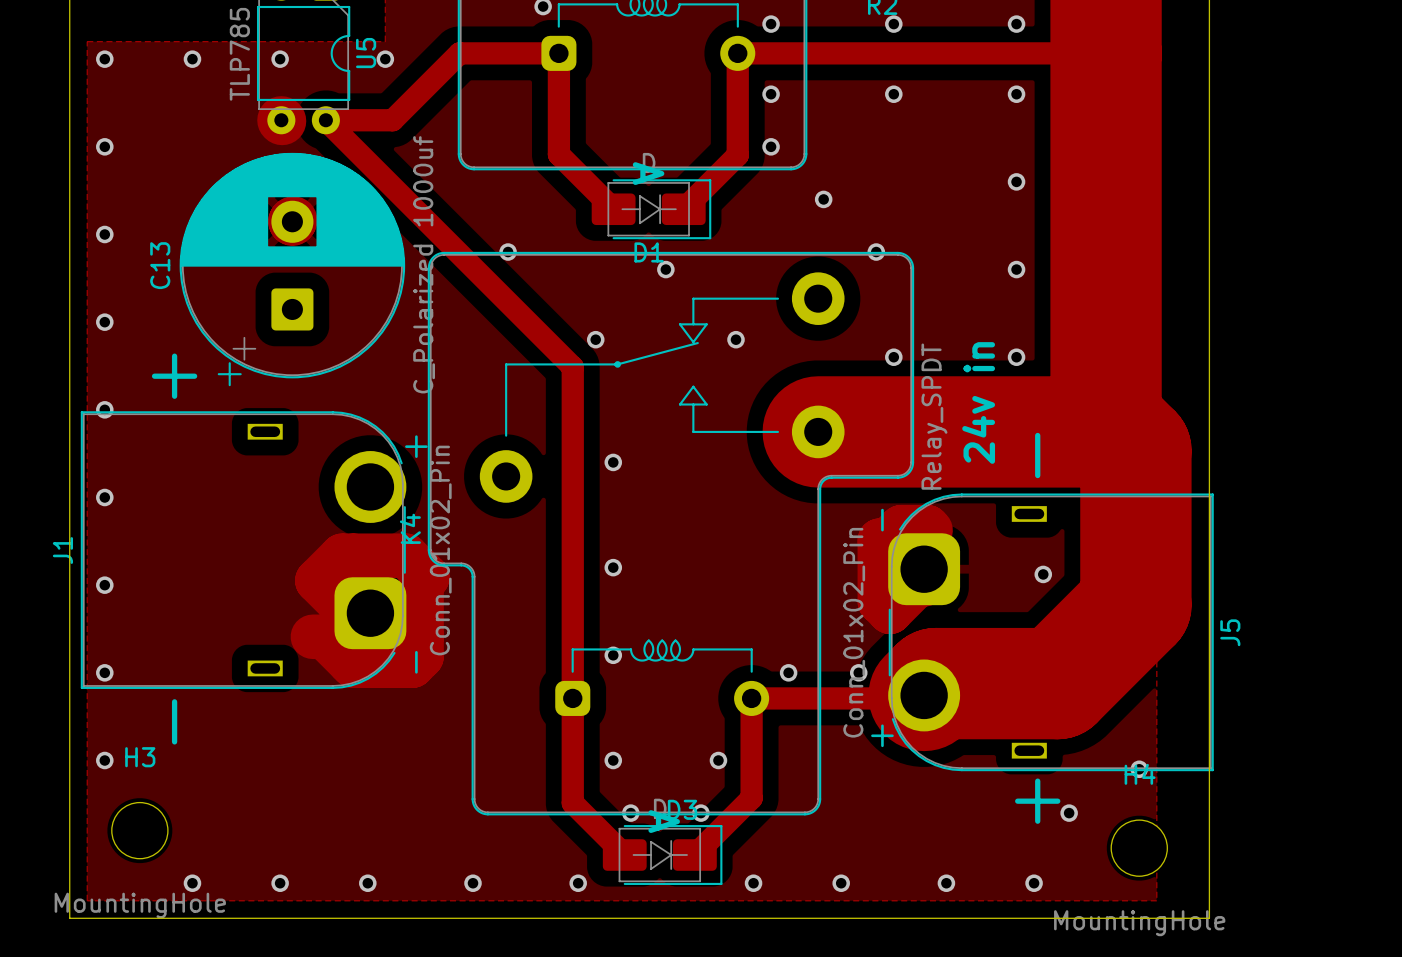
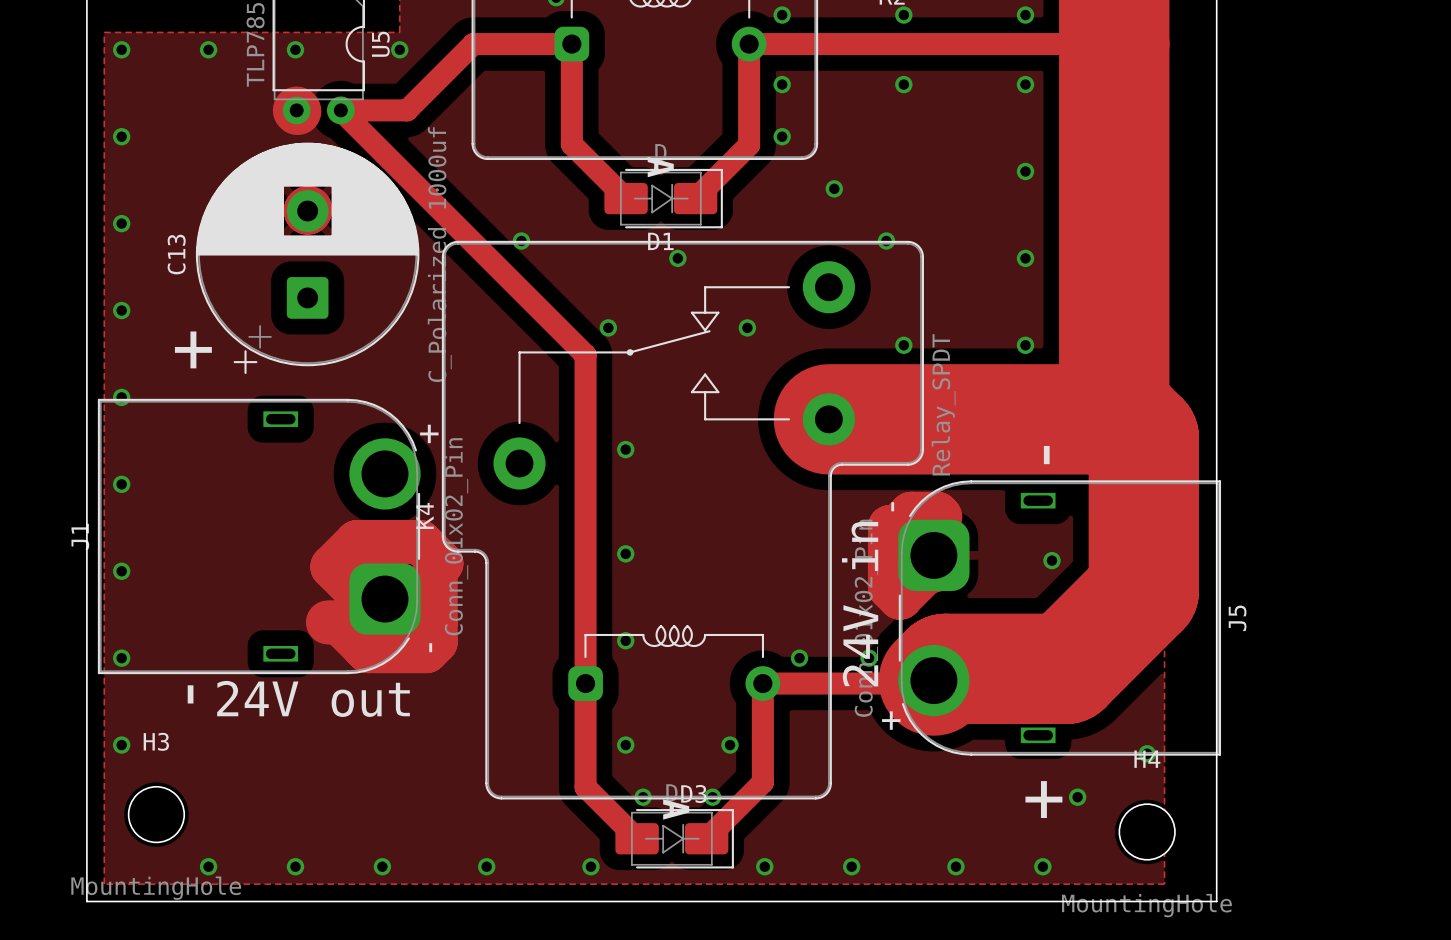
text: 24v in (978, 402) -> none
text: none -> 24V in (860, 604)
text: none -> 24V out (313, 698)

